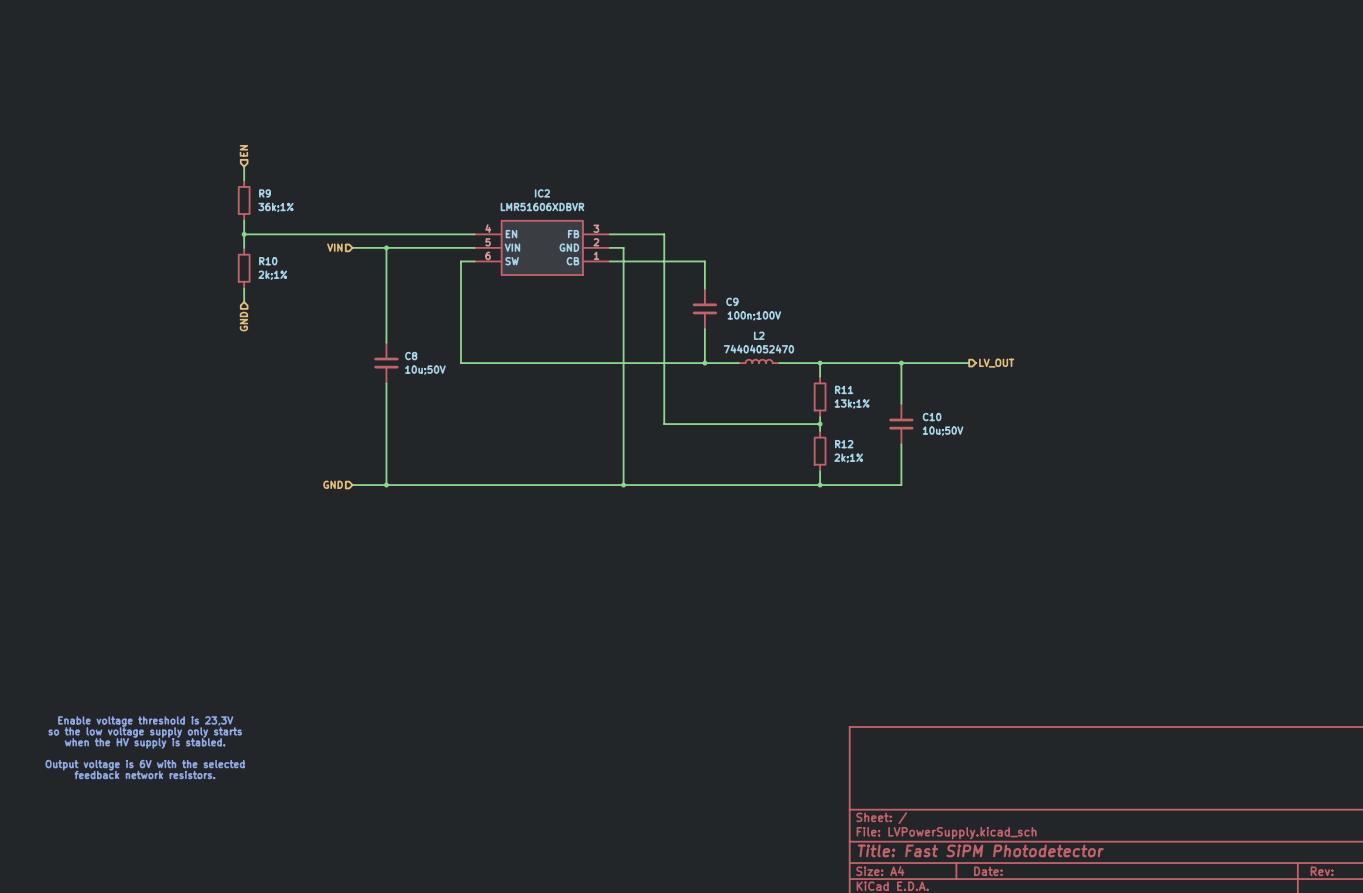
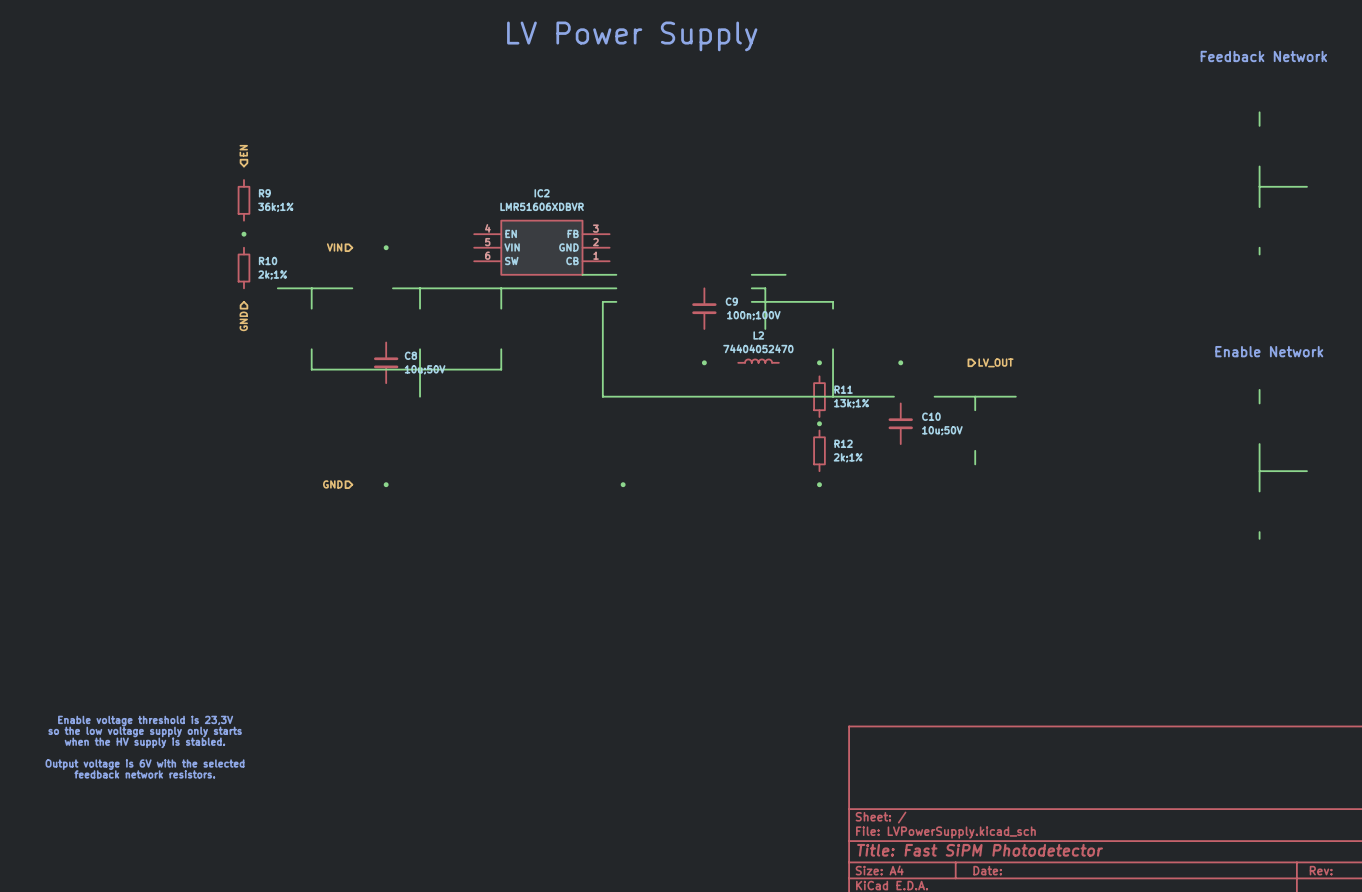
text: none -> LV Power Supply (632, 36)
text: none -> Feedback Network (1263, 56)
wire: none -> (1259, 112) (1259, 125)
wire: (244, 166) (244, 180) -> none
wire: none -> (1259, 166) (1259, 207)
wire: none -> (1259, 186) (1306, 186)
wire: (244, 220) (244, 247) -> none
wire: (244, 234) (474, 234) -> none
wire: (610, 234) (664, 234) (664, 424) (820, 424) -> none
wire: (352, 247) (474, 247) -> none
wire: (386, 247) (386, 342) -> none
wire: (610, 247) (623, 247) (623, 485) -> none
wire: none -> (1259, 247) (1259, 254)
wire: (474, 261) (460, 261) (460, 363) (738, 363) -> none
wire: (610, 261) (704, 261) (704, 288) -> none
wire: none -> (582, 274) (616, 274)
wire: none -> (751, 274) (785, 274)
wire: (244, 288) (244, 302) -> none
wire: none -> (277, 288) (352, 288)
wire: none -> (311, 288) (311, 308)
wire: none -> (392, 288) (616, 288)
wire: none -> (420, 288) (420, 308)
wire: none -> (501, 288) (501, 308)
wire: none -> (751, 288) (765, 288) (765, 328)
wire: none -> (616, 301) (602, 301) (602, 396) (893, 396)
wire: none -> (751, 301) (833, 301) (833, 308)
wire: (704, 329) (704, 363) -> none
wire: none -> (311, 349) (311, 369) (501, 369) (501, 349)
wire: none -> (420, 349) (420, 396)
wire: none -> (833, 349) (833, 396)
text: none -> Enable Network (1269, 351)
wire: (779, 363) (969, 363) -> none
wire: (820, 363) (820, 376) -> none
wire: (901, 363) (901, 403) -> none
wire: (386, 383) (386, 485) -> none
wire: none -> (1259, 389) (1259, 403)
wire: none -> (934, 396) (1015, 396)
wire: none -> (975, 396) (975, 410)
wire: (820, 417) (820, 430) -> none
wire: (901, 444) (901, 485) (352, 485) -> none
wire: none -> (1259, 444) (1259, 491)
wire: none -> (975, 450) (975, 464)
wire: (820, 471) (820, 485) -> none
wire: none -> (1259, 471) (1306, 471)
wire: none -> (1259, 532) (1259, 538)

